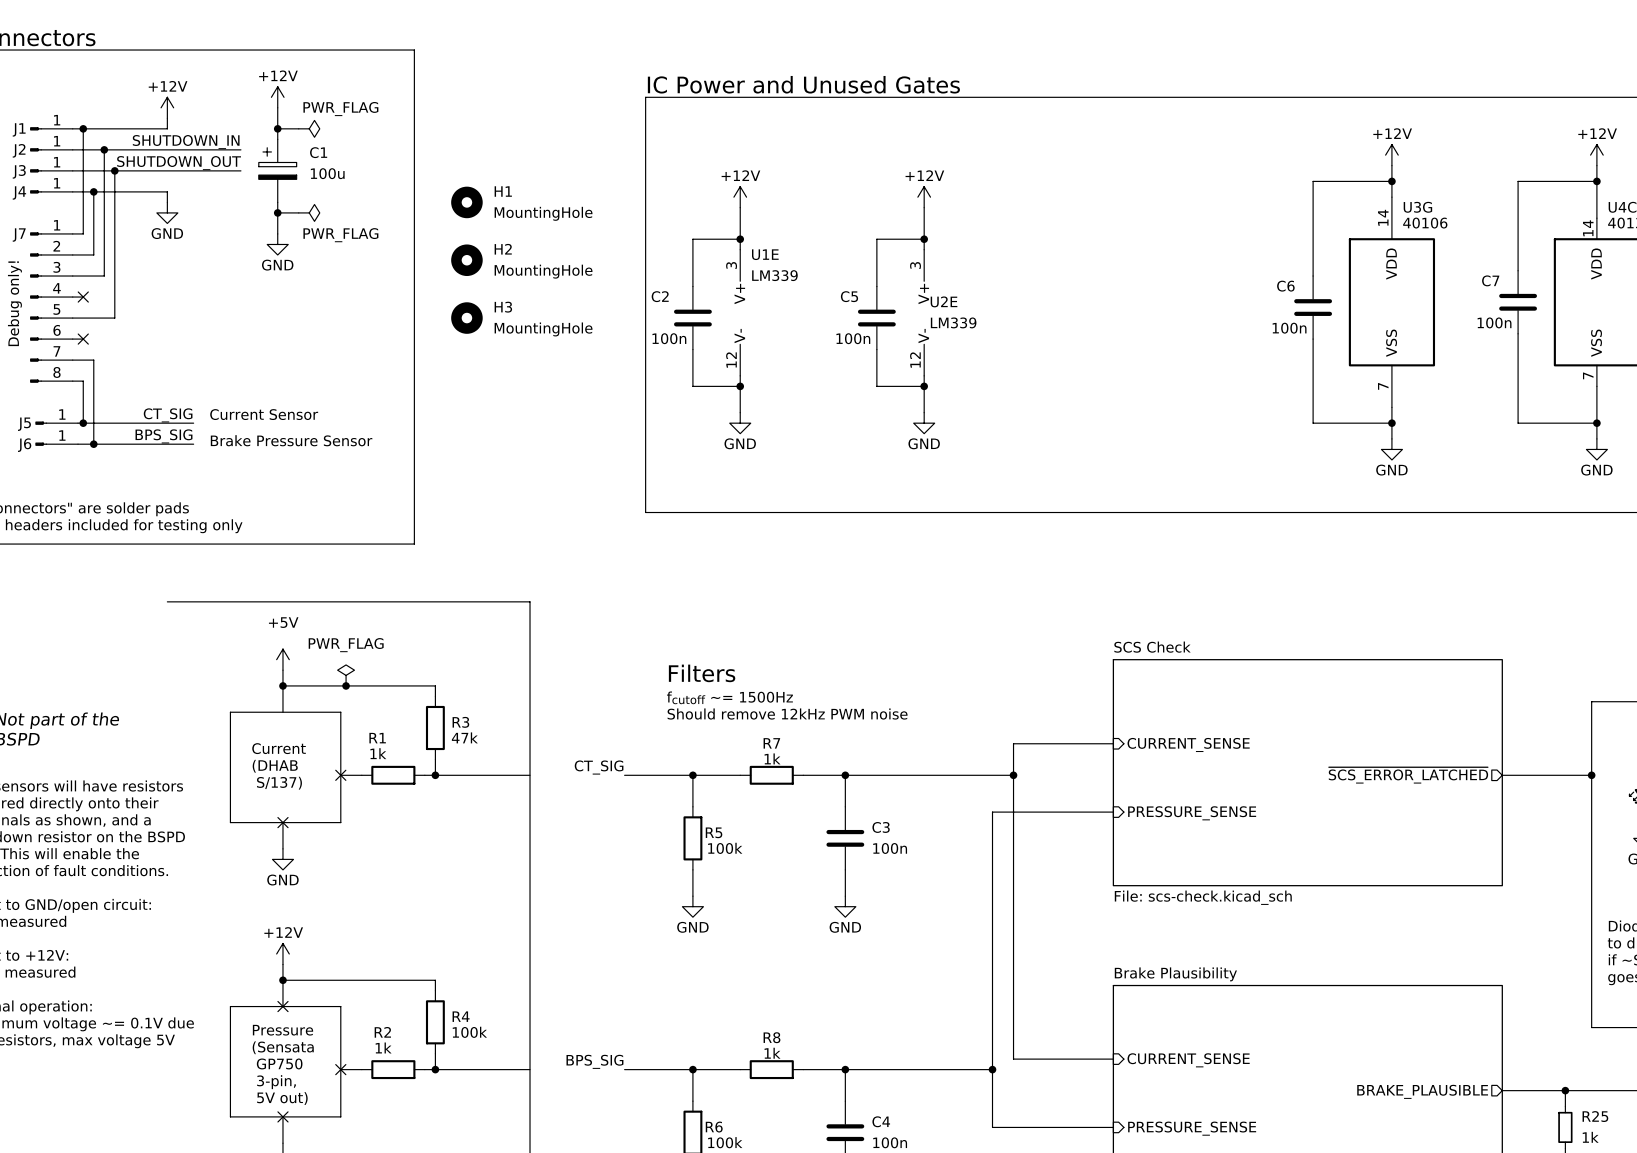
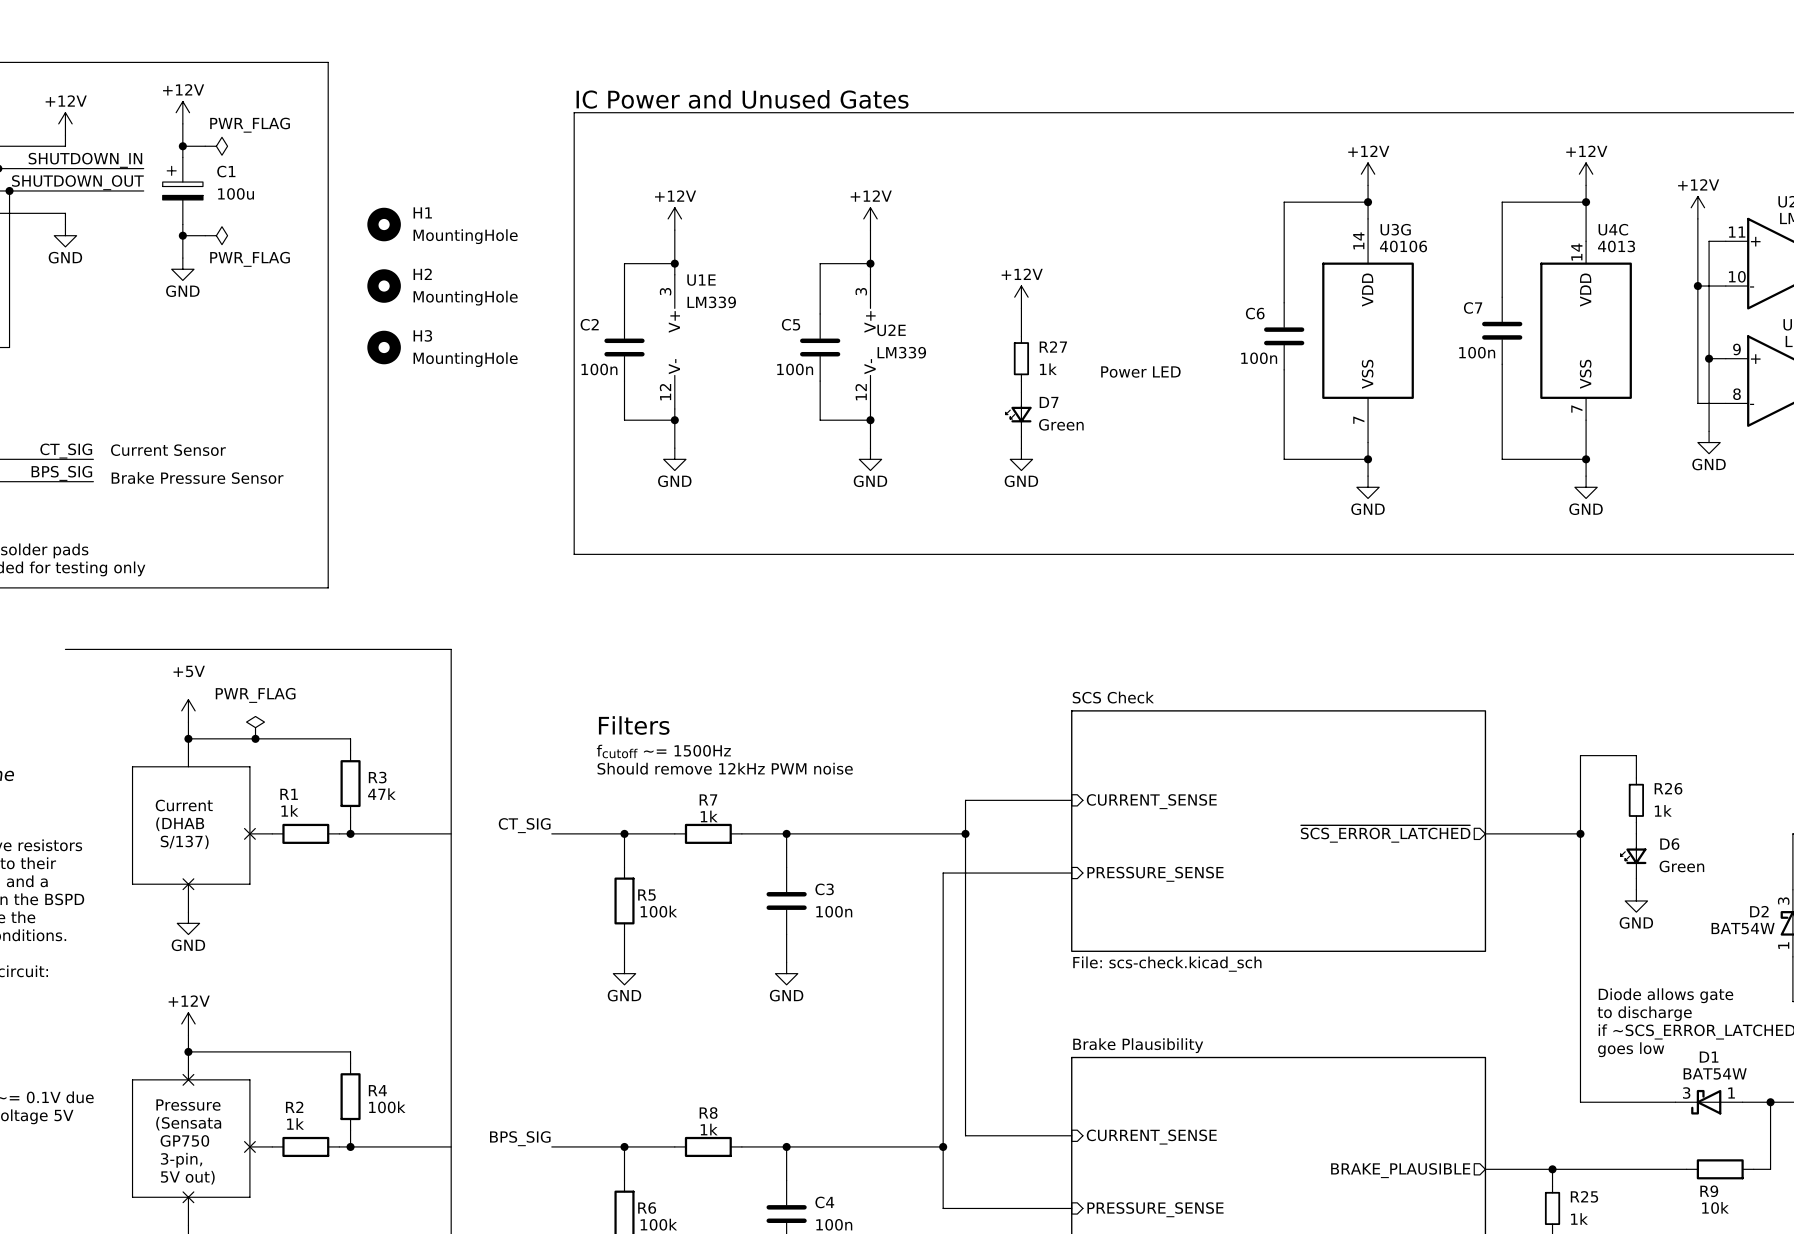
power symbol: none -> +12V (1021, 297)
wire: none -> (1021, 308) (1021, 336)
R27: none -> 1k (1021, 358)
text: none -> Power LED (1140, 372)
wire: none -> (1021, 381) (1021, 392)
D7: none -> Green (1018, 414)
wire: none -> (1021, 436) (1021, 448)
power symbol: none -> GND (1021, 459)

